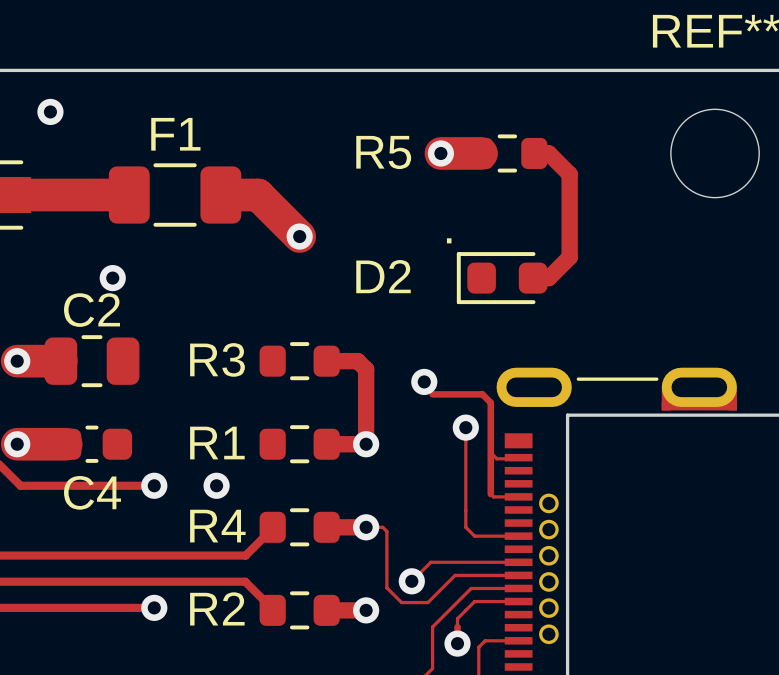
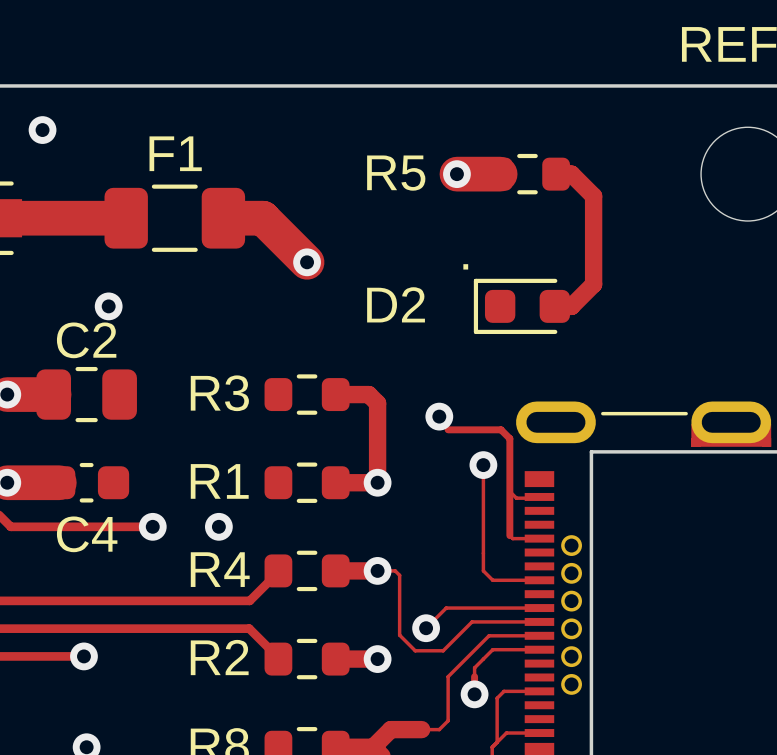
track: (89, 607) (154, 607) -> none
via position: (154, 607) -> (83, 656)

